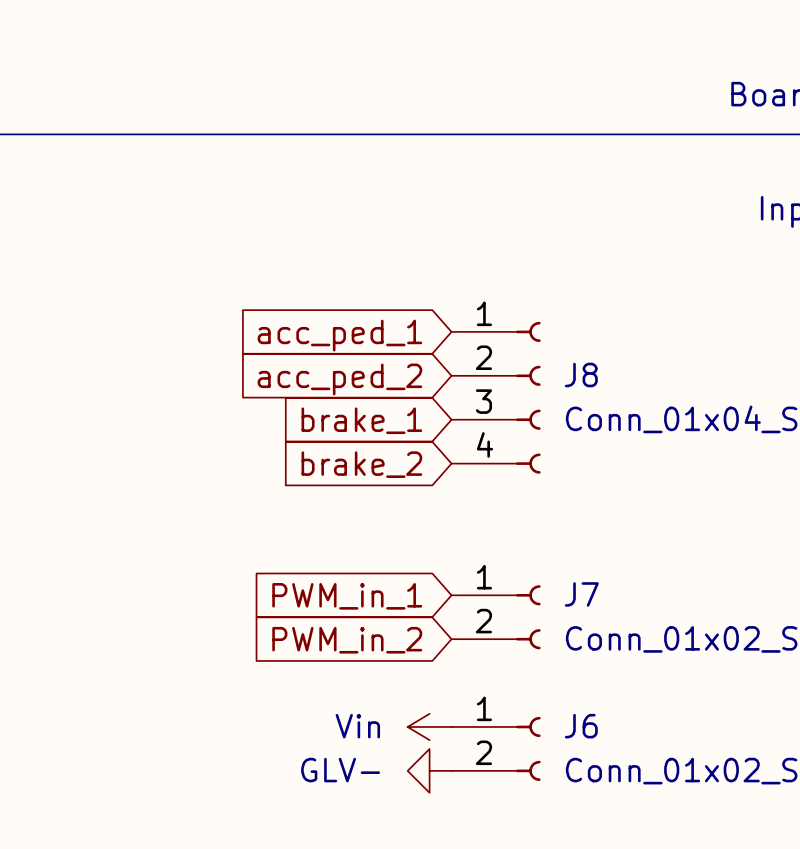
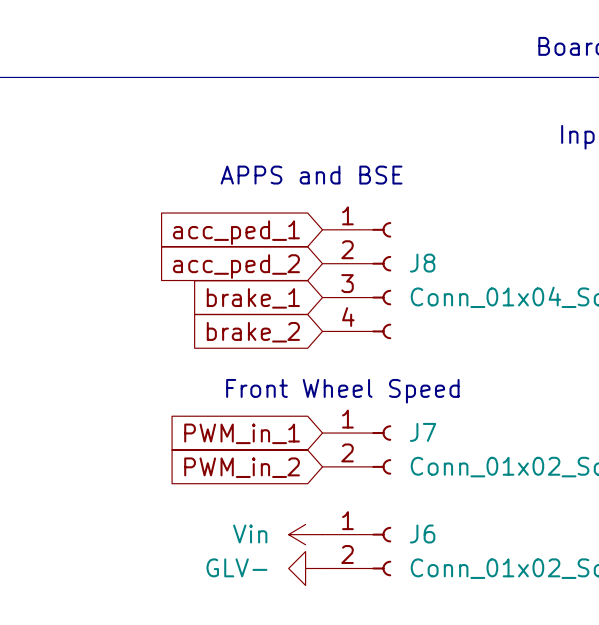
text: none -> APPS and BSE (311, 175)
text: none -> Front Wheel Speed (342, 391)

